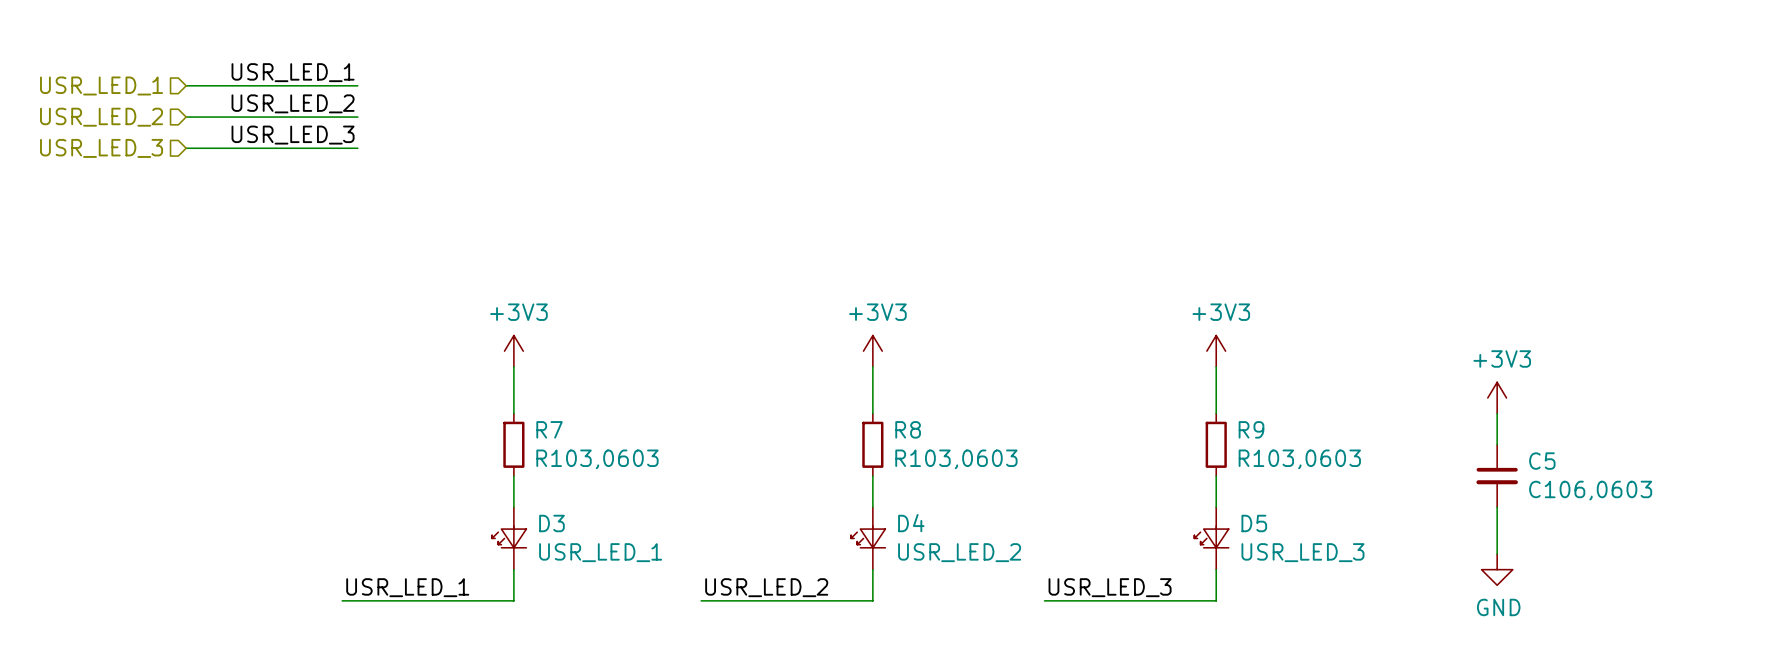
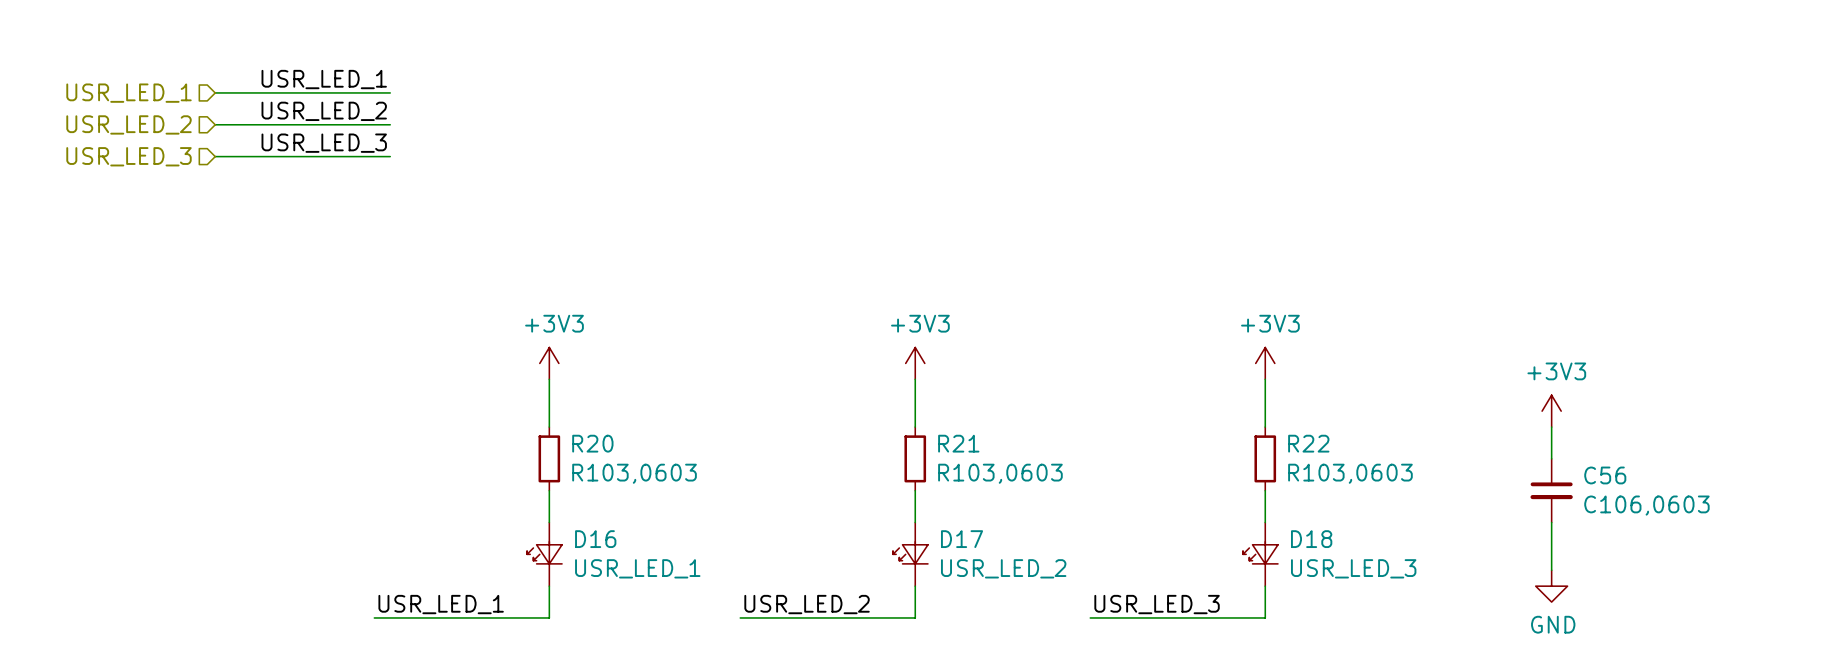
R7 name: R7 (549, 429) -> R20 (592, 443)
R8 name: R8 (908, 429) -> R21 (958, 443)
R9 name: R9 (1251, 429) -> R22 (1308, 443)
C5 name: C5 (1542, 461) -> C56 (1605, 475)
D3 name: D3 (551, 523) -> D16 (595, 539)
D4 name: D4 (911, 523) -> D17 (962, 539)
D5 name: D5 (1254, 523) -> D18 (1311, 539)

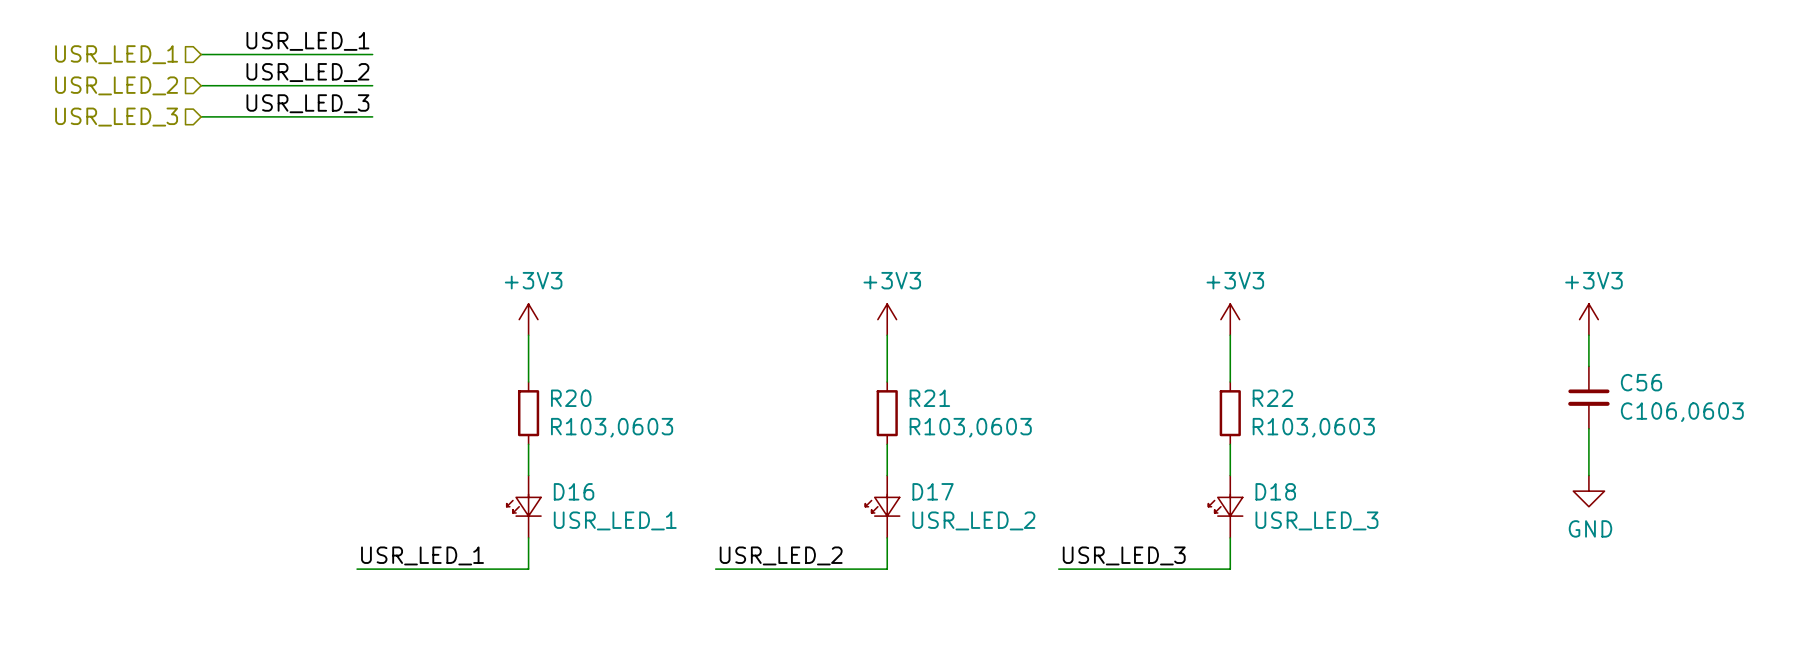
power symbol position: +3V3 (1551, 411) -> +3V3 (1588, 319)
wire: (1551, 427) (1551, 458) -> (1588, 335) (1588, 366)
C56 position: (1551, 490) -> (1588, 397)
wire: (1551, 522) (1551, 570) -> (1588, 428) (1588, 475)
power symbol position: GND (1551, 586) -> GND (1588, 491)

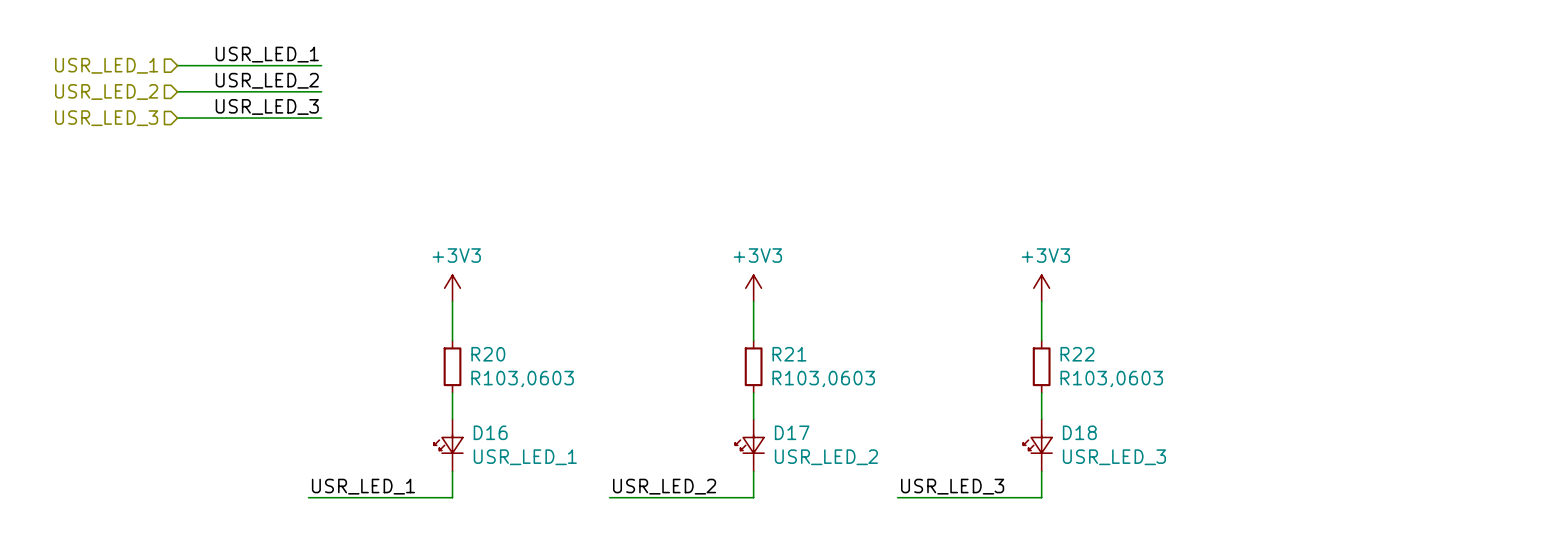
power symbol: +3V3 (1588, 319) -> none
wire: (1588, 335) (1588, 366) -> none
C56: C106,0603 (1588, 397) -> none
wire: (1588, 428) (1588, 475) -> none
power symbol: GND (1588, 491) -> none

